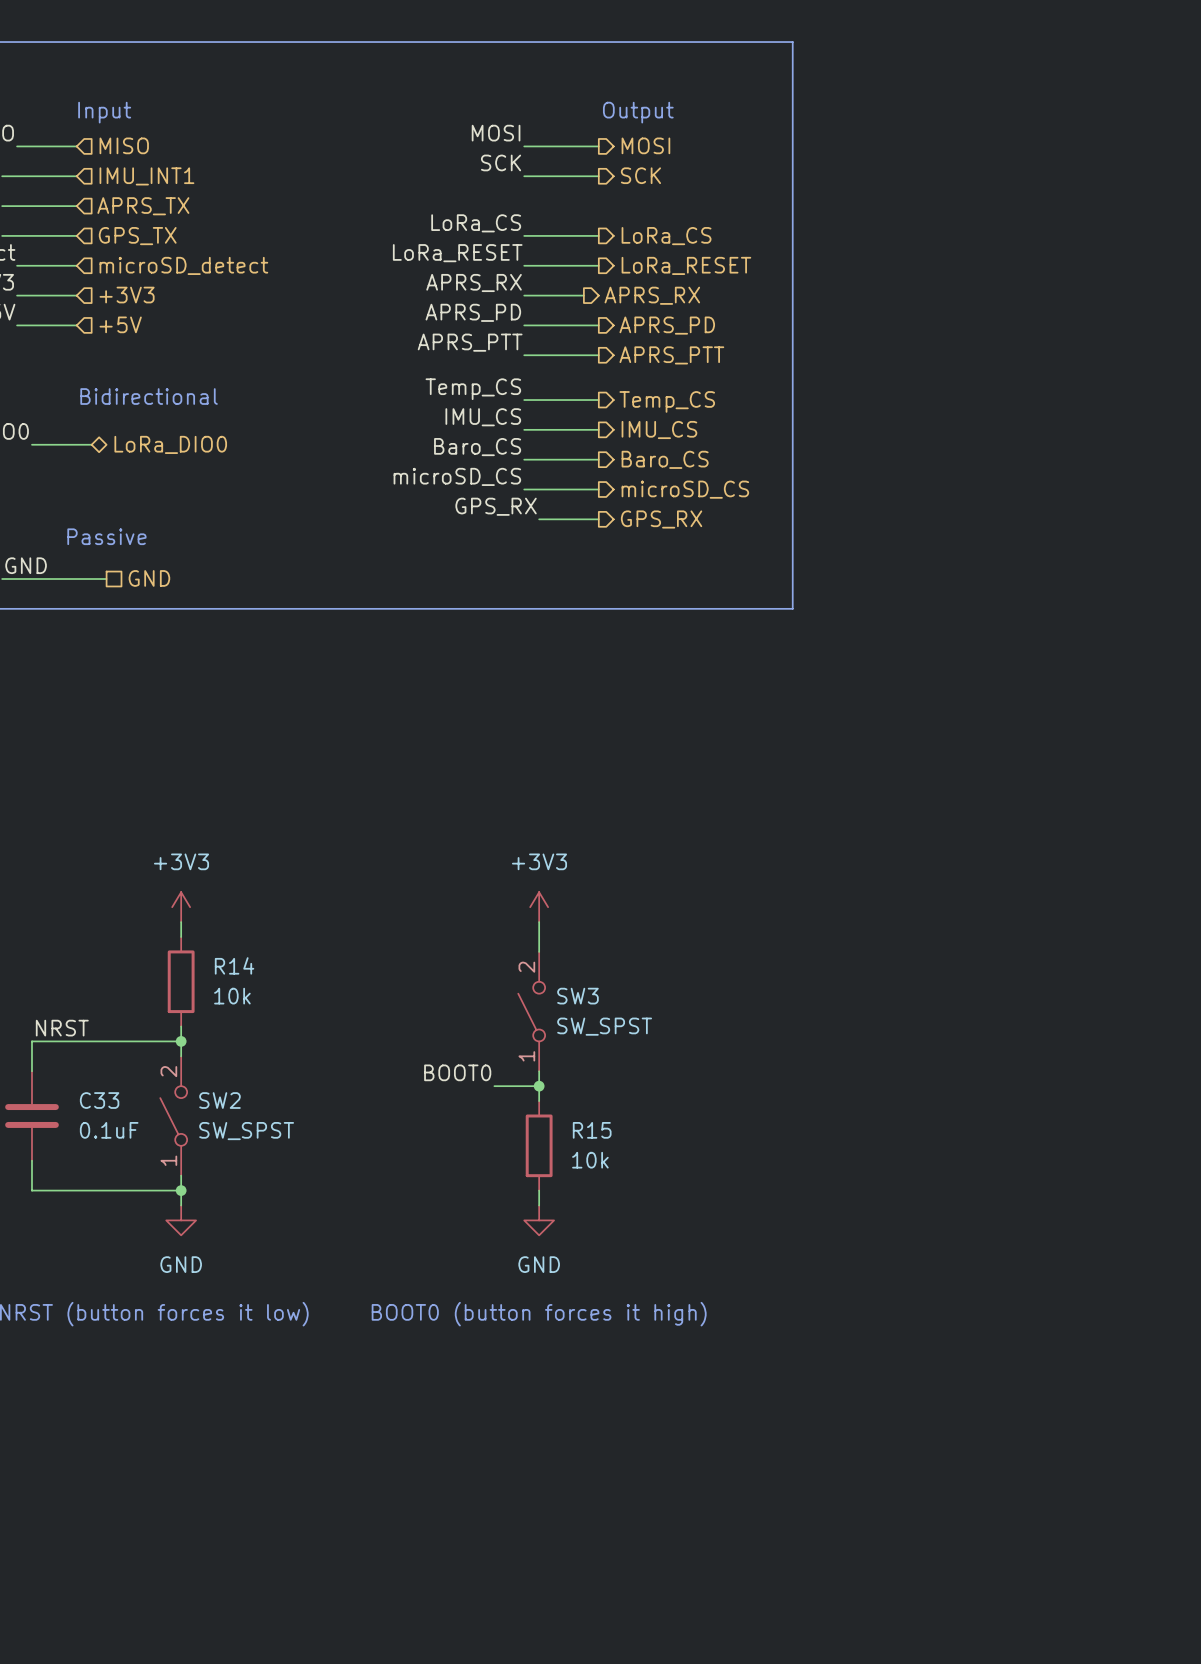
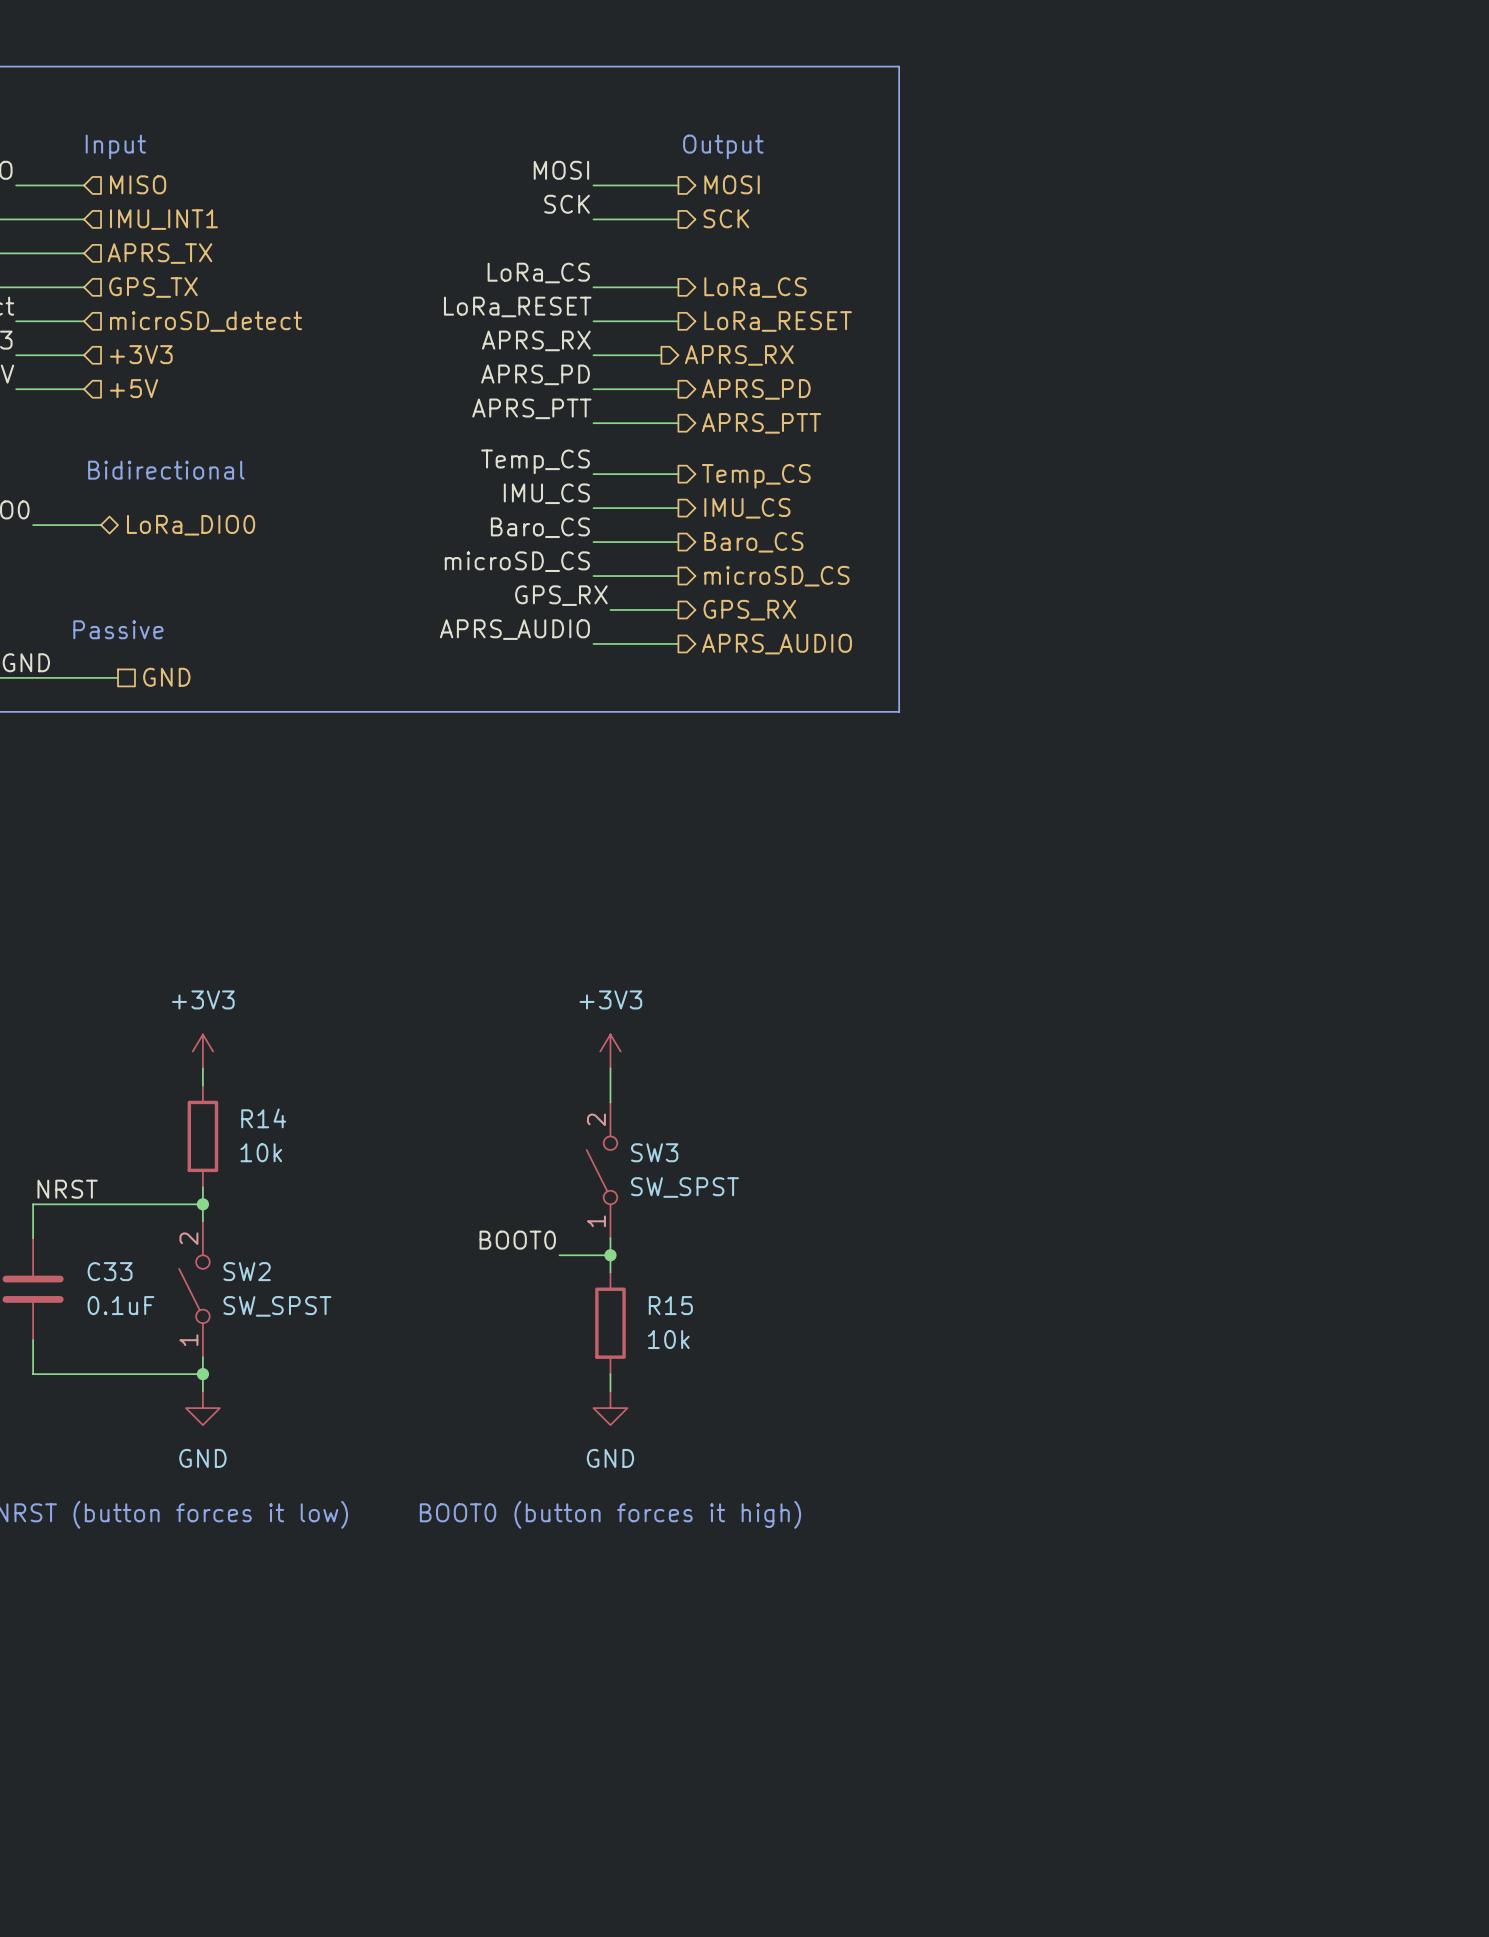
label: none -> APRS_AUDIO (514, 629)
wire: none -> (593, 643) (678, 643)
hierarchical label: none -> APRS_AUDIO (776, 644)

